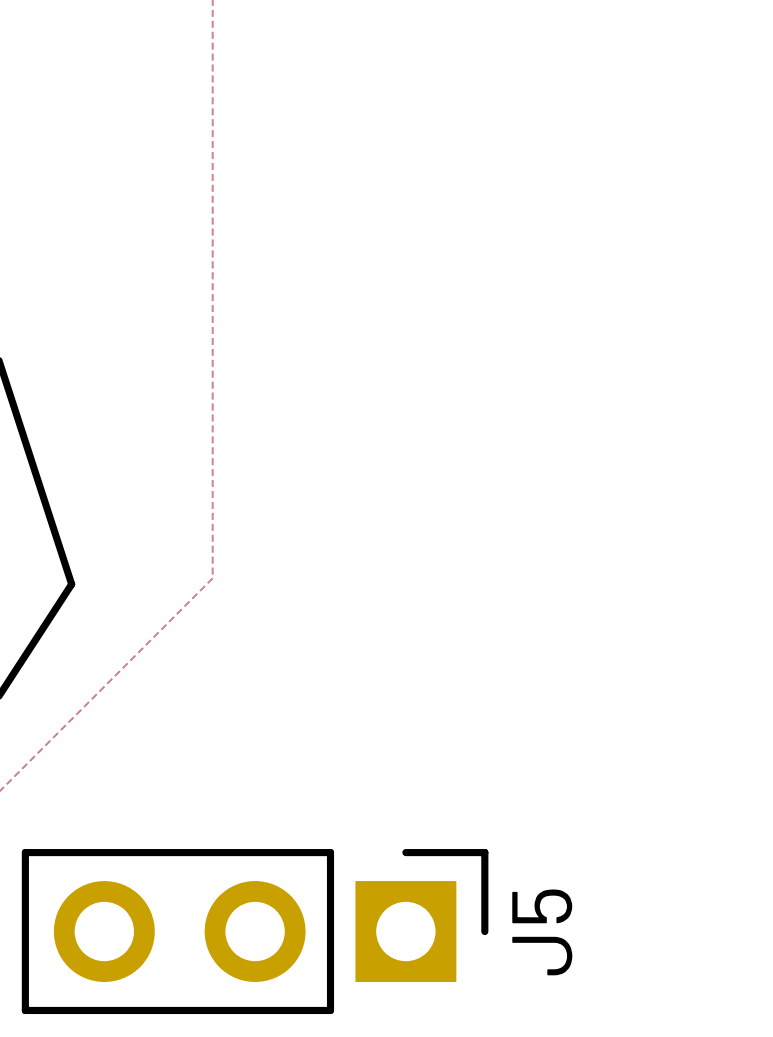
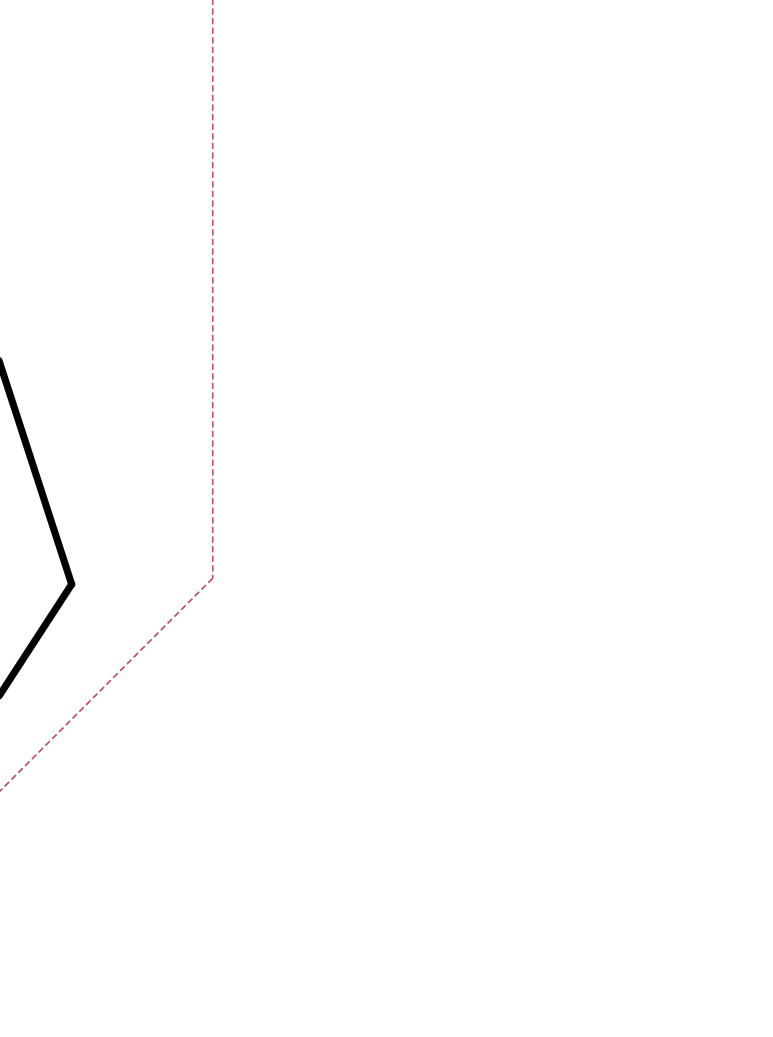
J5: (255, 931) -> none

